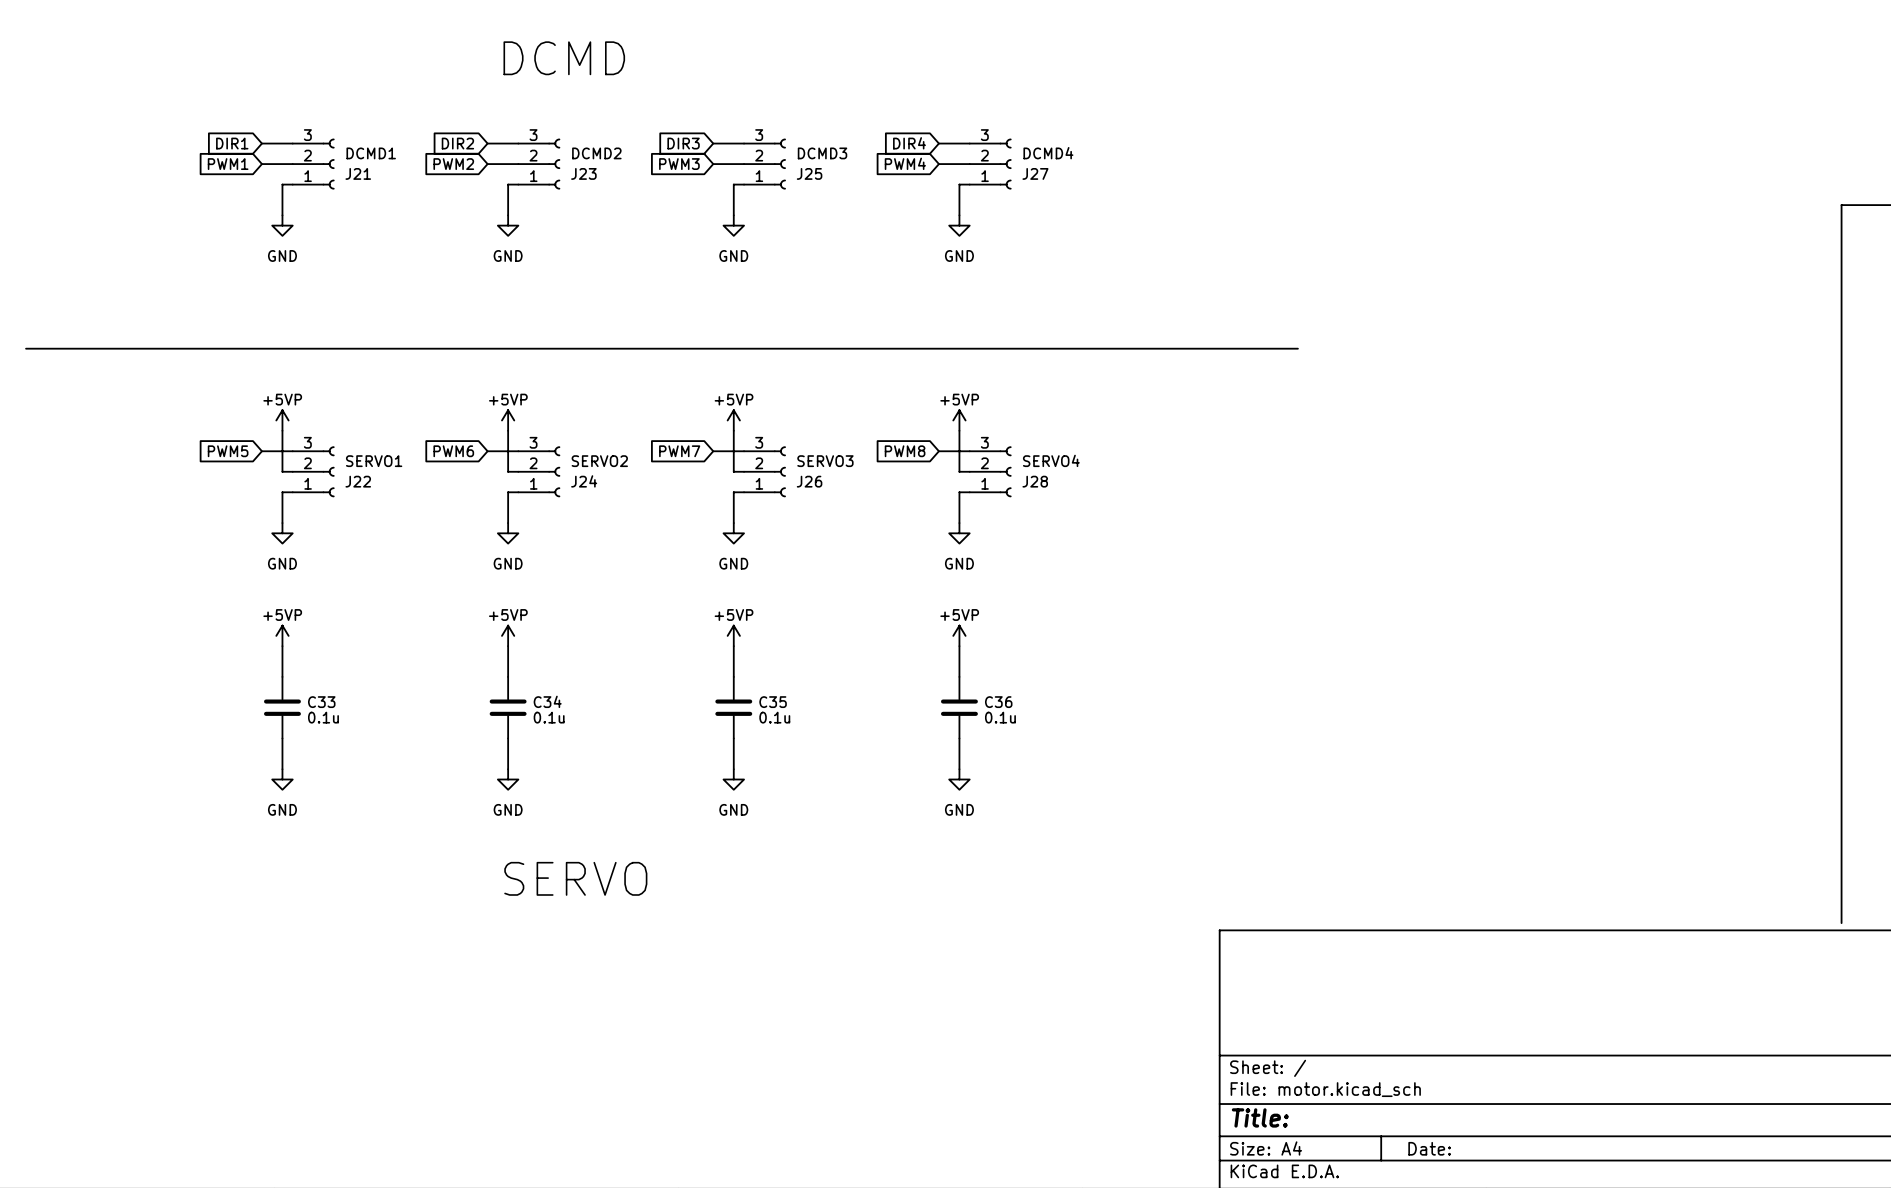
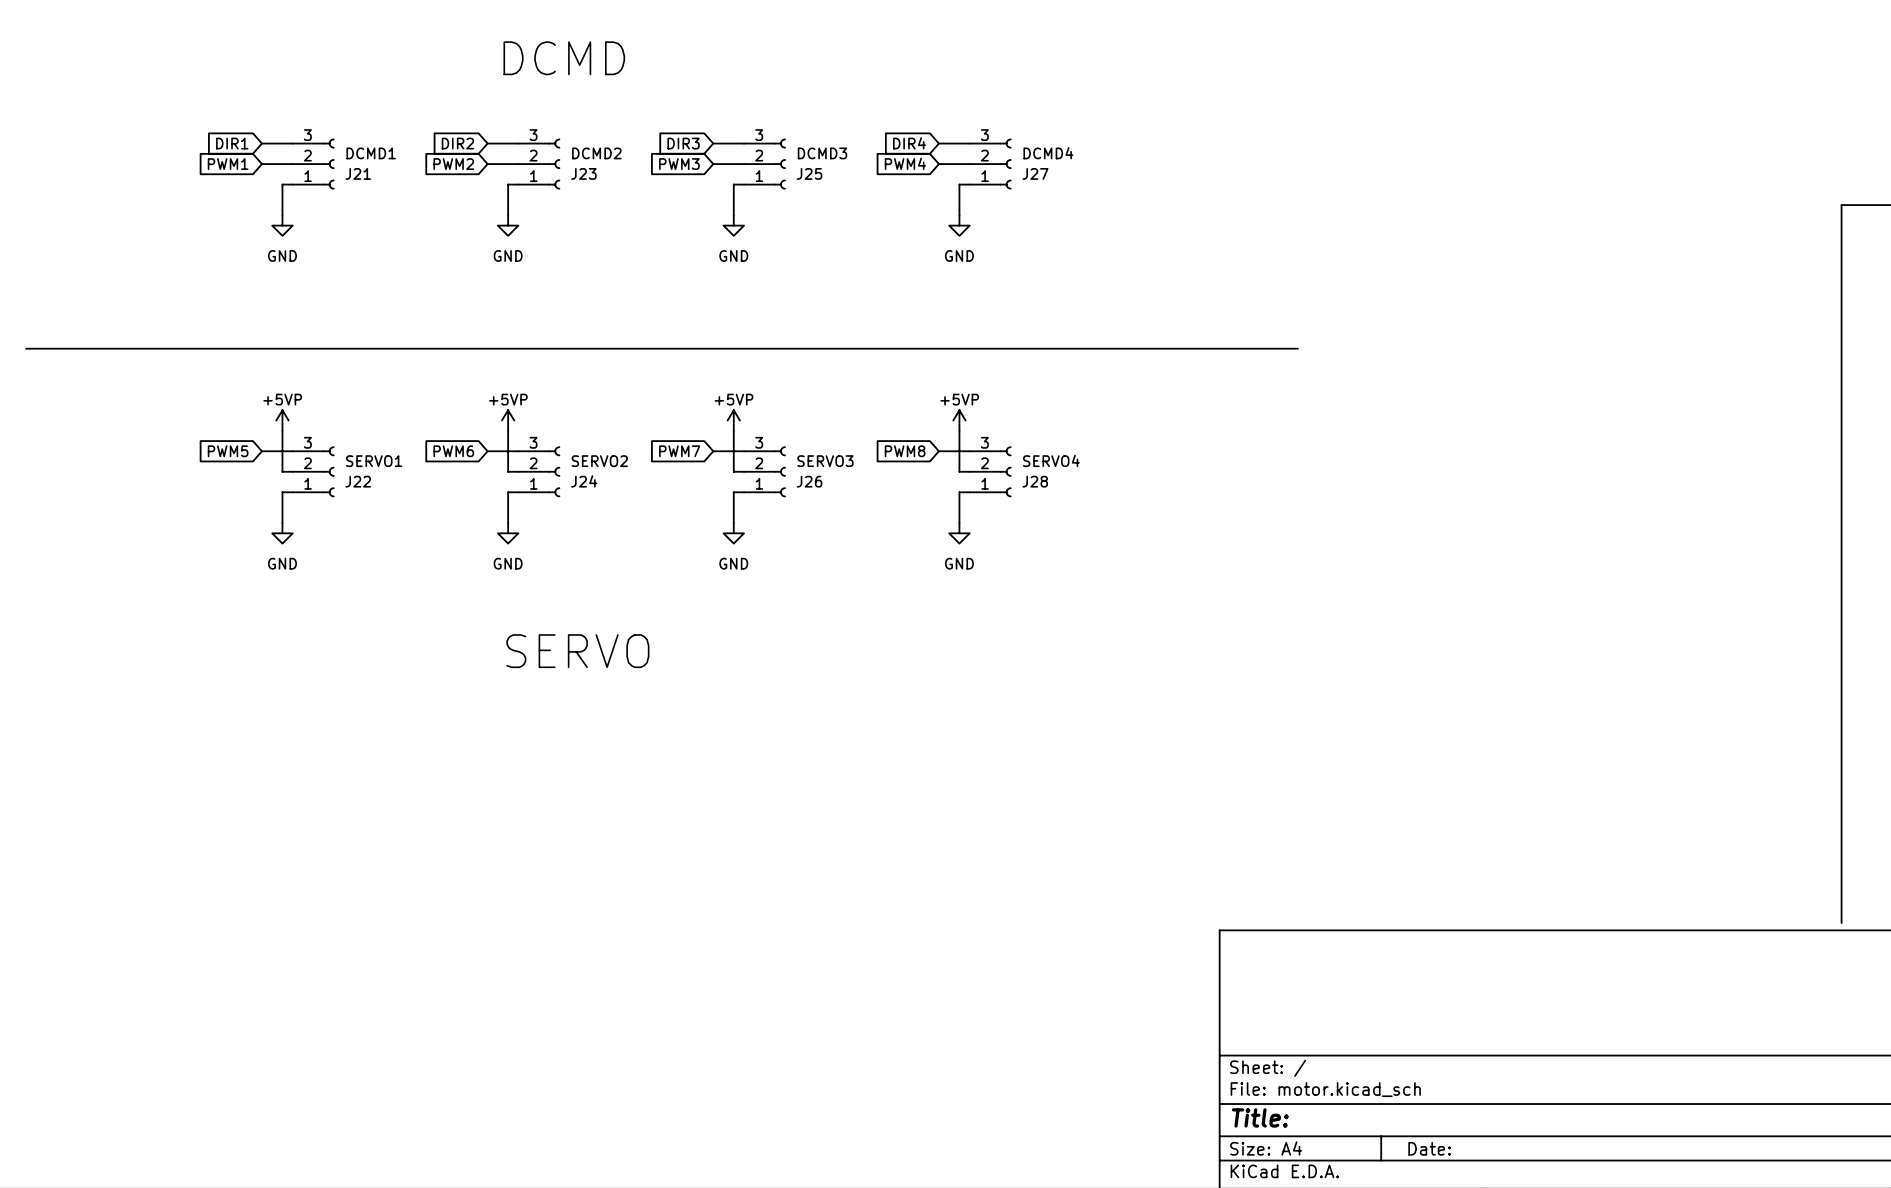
power symbol: +5VP (282, 635) -> none
power symbol: +5VP (508, 635) -> none
power symbol: +5VP (733, 635) -> none
power symbol: +5VP (959, 635) -> none
wire: (282, 646) (282, 676) -> none
wire: (508, 646) (508, 676) -> none
wire: (733, 646) (733, 676) -> none
wire: (959, 646) (959, 676) -> none
text: none -> SERVO (577, 651)
C33: 0.1u (282, 707) -> none
C34: 0.1u (508, 707) -> none
C35: 0.1u (733, 707) -> none
C36: 0.1u (959, 707) -> none
wire: (282, 738) (282, 769) -> none
wire: (508, 738) (508, 769) -> none
wire: (733, 738) (733, 769) -> none
wire: (959, 738) (959, 769) -> none
power symbol: GND (282, 779) -> none
power symbol: GND (508, 779) -> none
power symbol: GND (733, 779) -> none
power symbol: GND (959, 779) -> none
text: SERVO (575, 878) -> none

